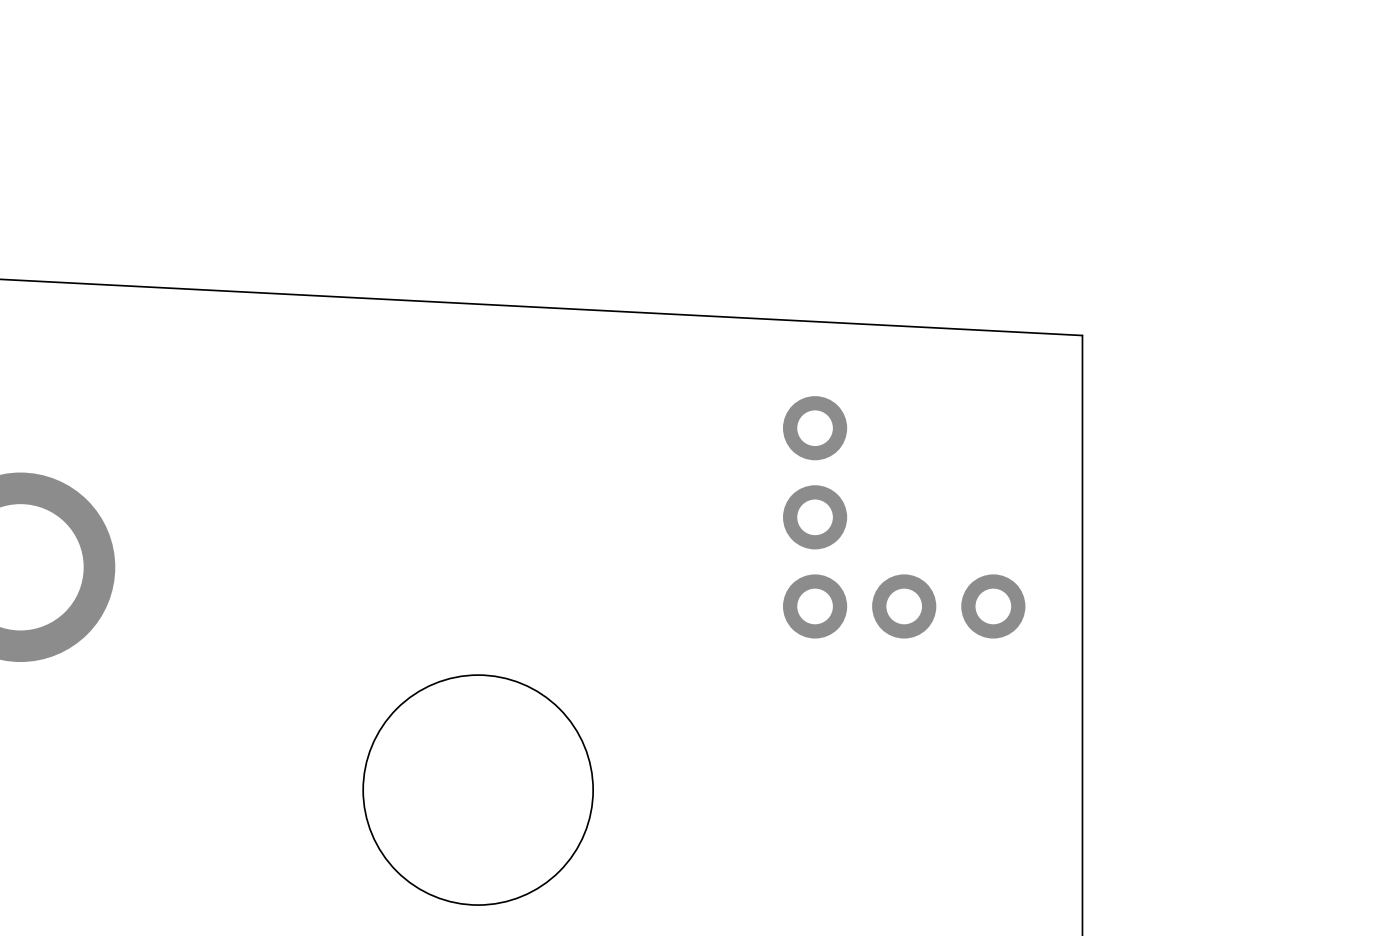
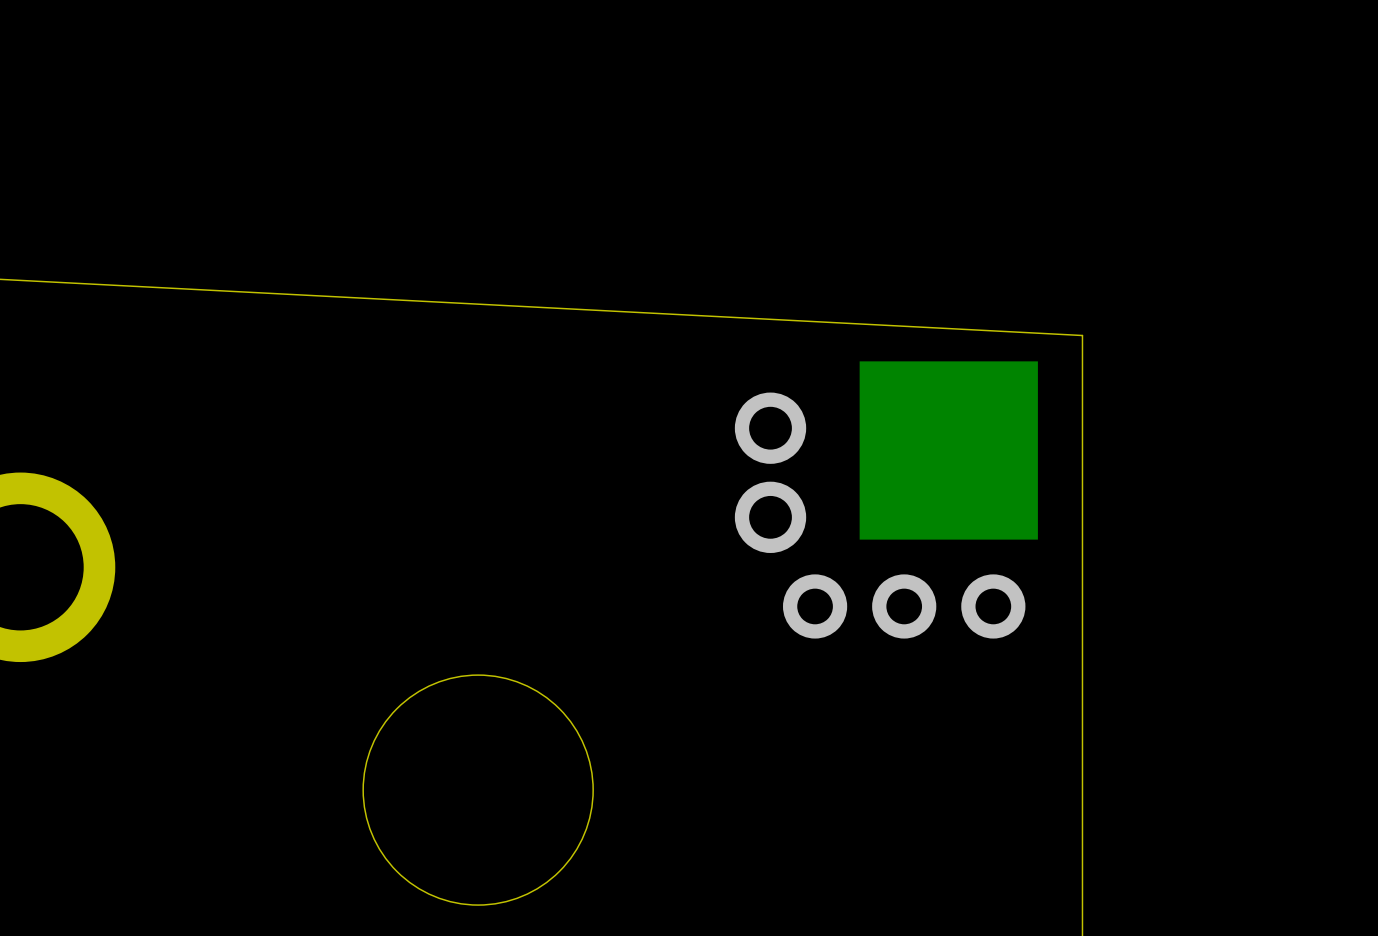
via position: (815, 428) -> (770, 428)
part: none -> (948, 450)
via position: (815, 517) -> (770, 517)

